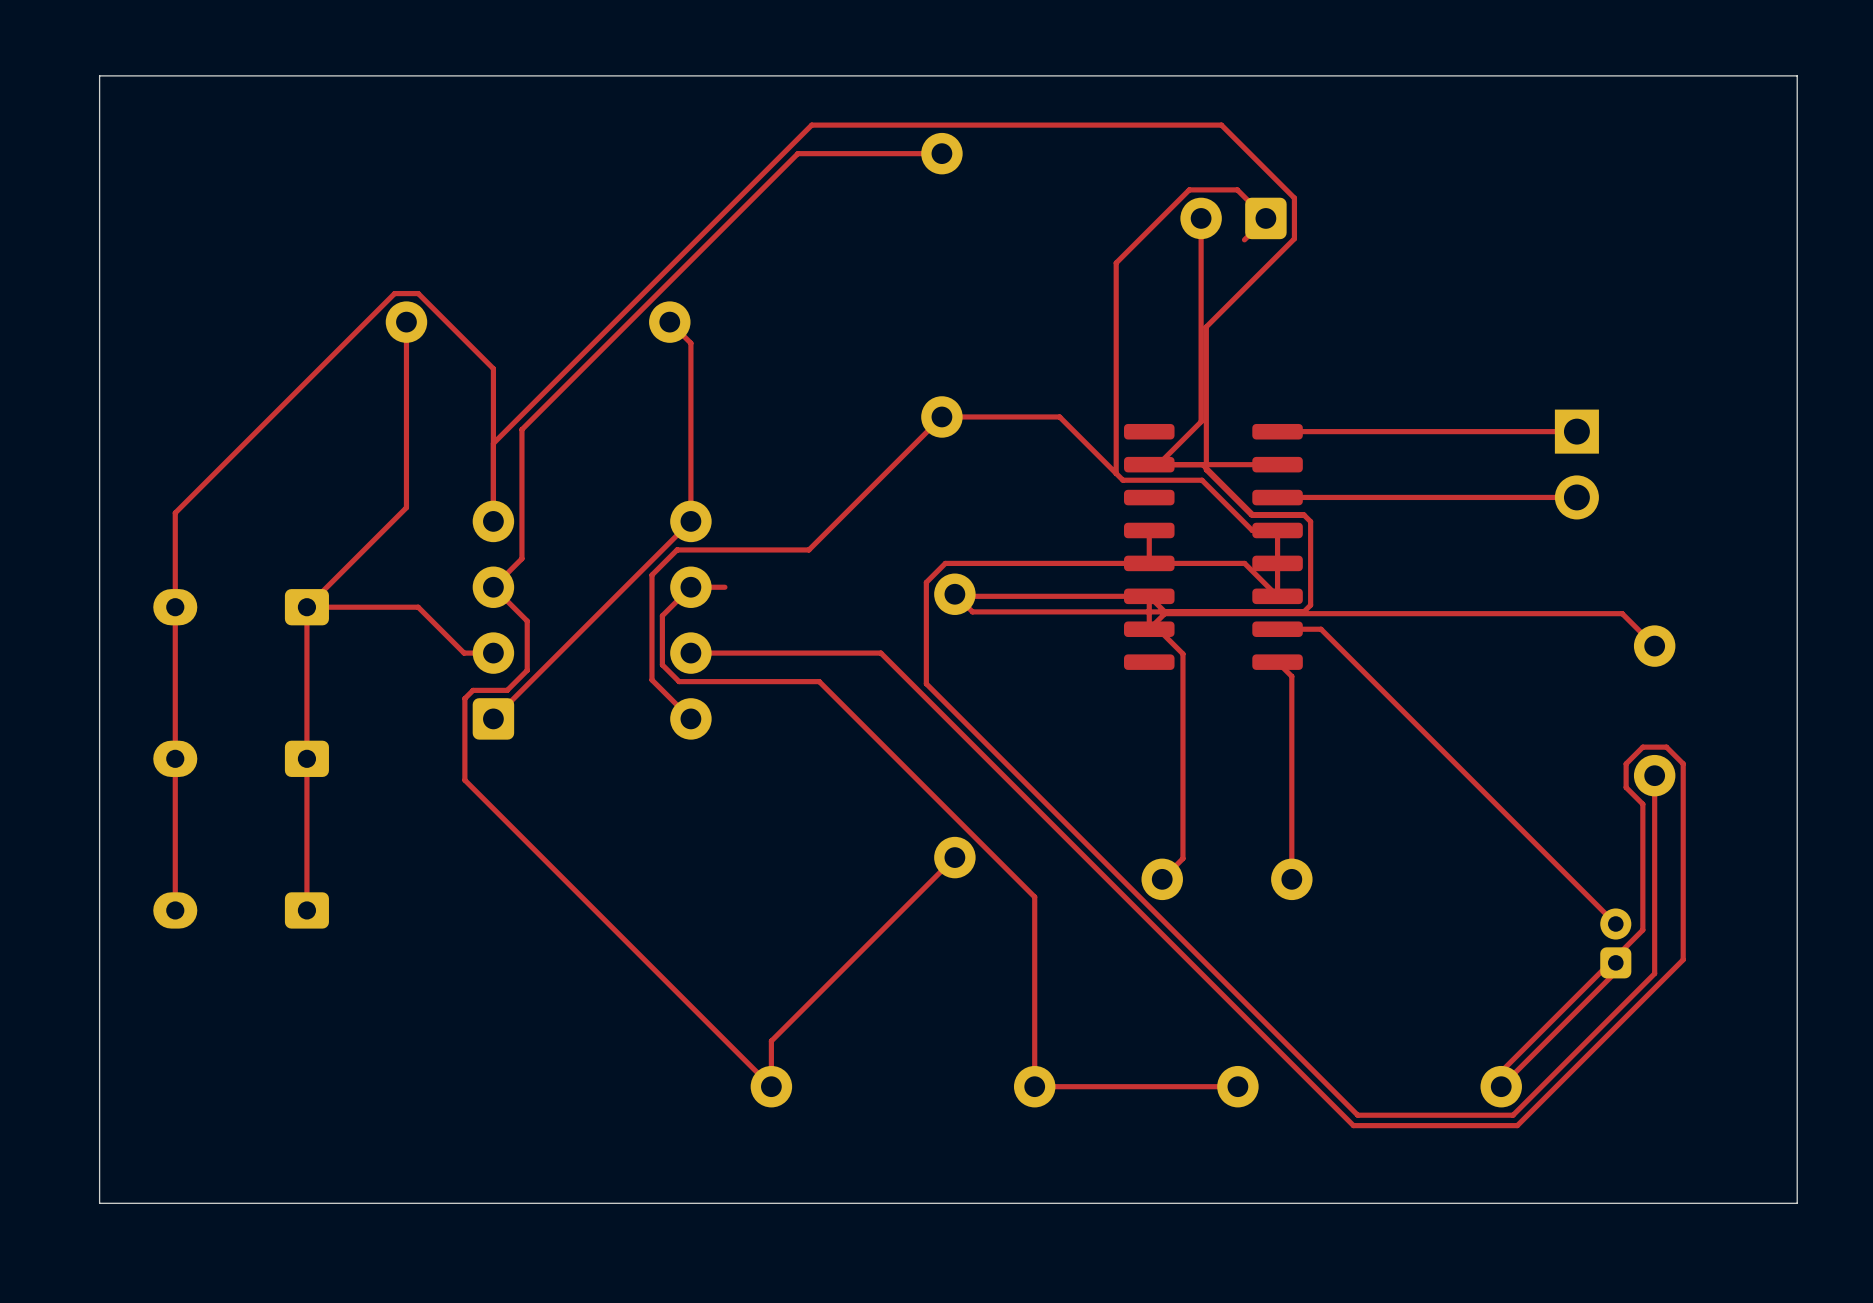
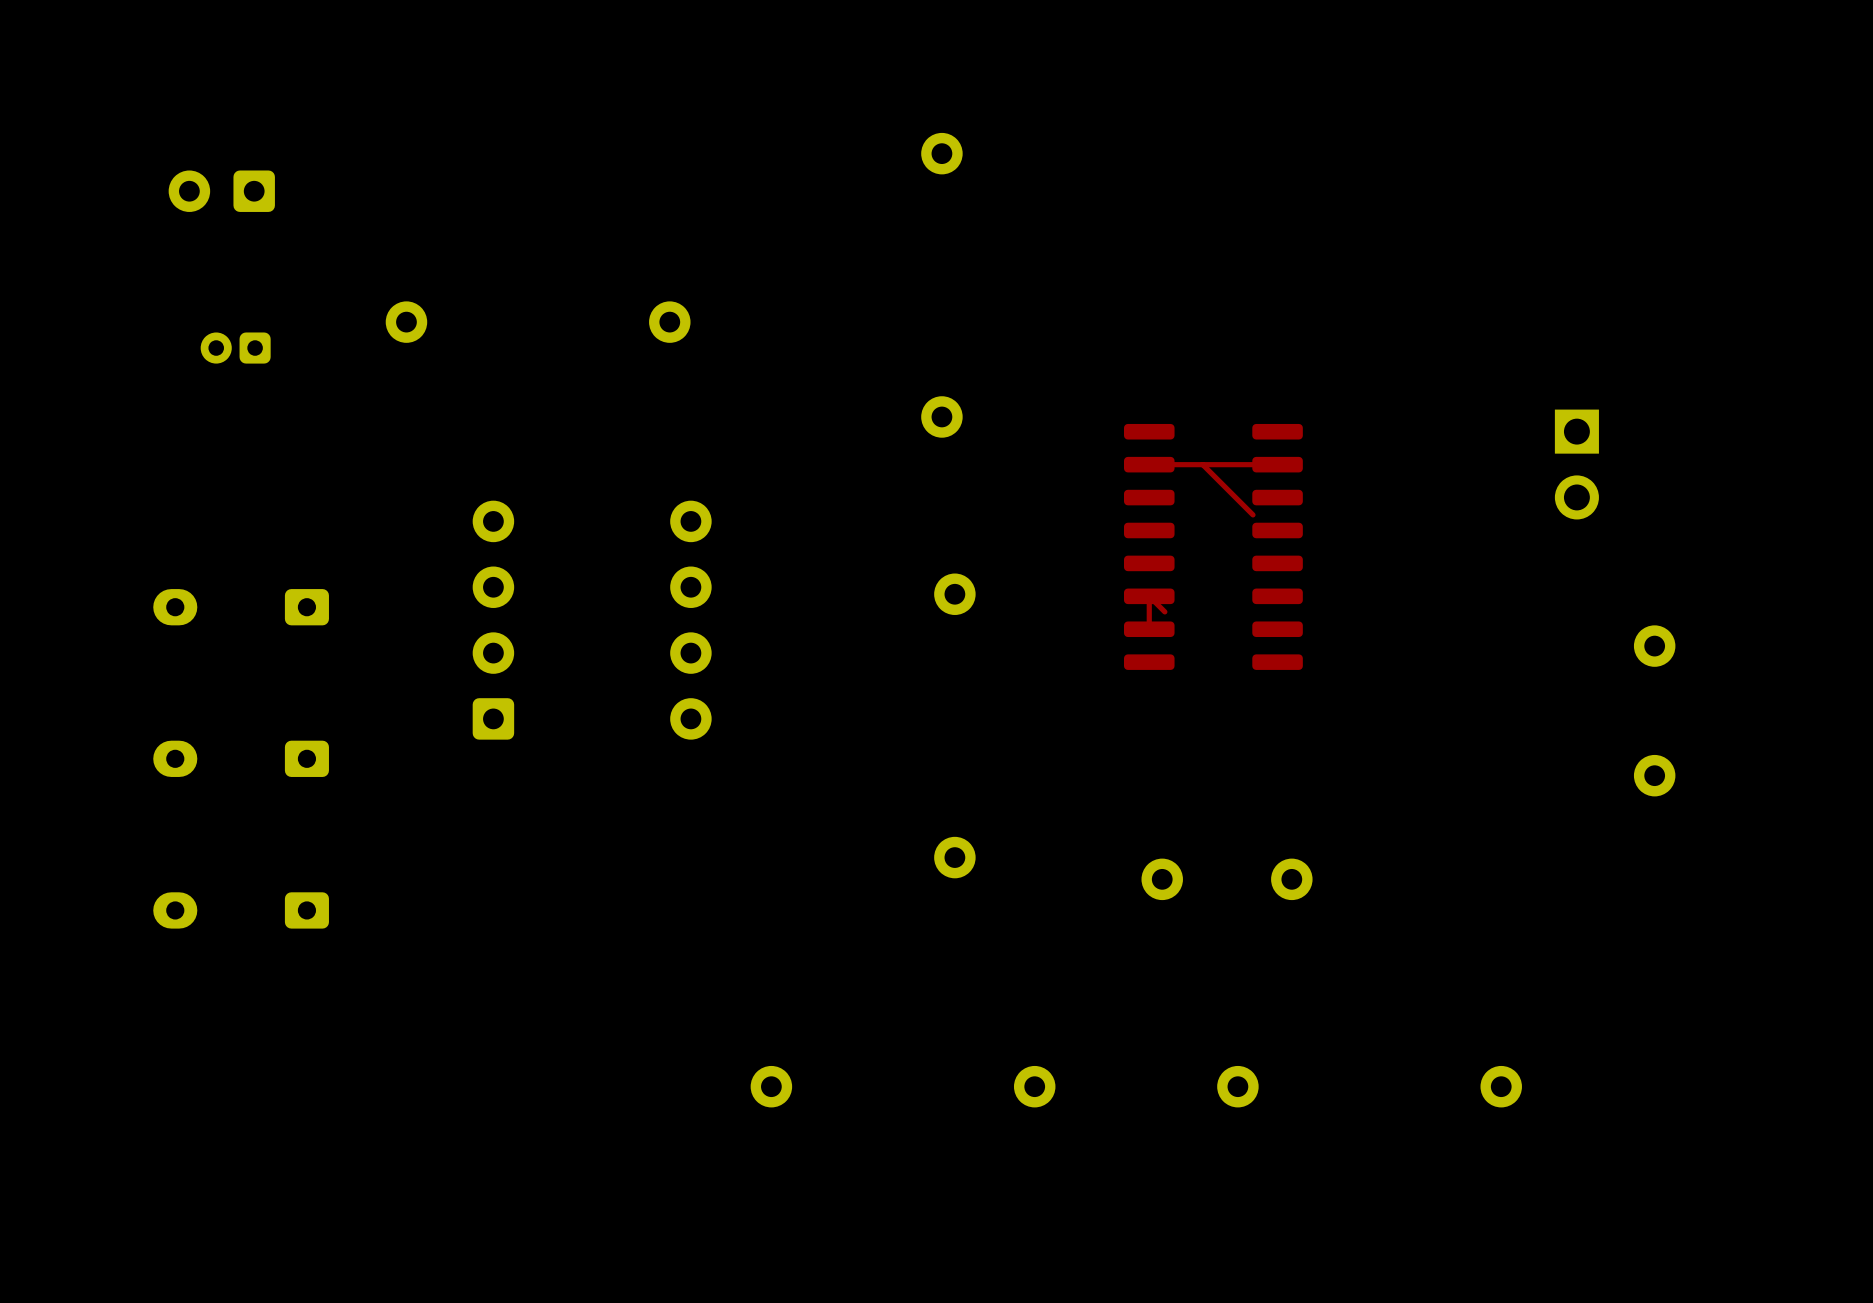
board edge: (1797, 75) (99, 75) (99, 1203) (1797, 1203) (1797, 75) -> none
top track: (941, 153) (797, 153) (521, 429) (521, 558) (493, 587) (527, 621) (527, 670) (507, 690) (473, 690) (464, 698) (464, 780) (771, 1086) (771, 1041) (954, 857) -> none
part: none -> (221, 191)
top track: (1201, 218) (1201, 421) (1158, 464) -> none
part: (1233, 218) -> none
top track: (1244, 239) (1265, 218) (1237, 189) (1189, 189) (1116, 262) (1116, 473) -> none
top track: (406, 322) (406, 507) (306, 607) -> none
top track: (669, 322) (690, 343) (690, 521) (493, 718) -> none
part: none -> (235, 348)
top track: (1576, 431) (1277, 431) -> none
top track: (493, 443) (811, 125) (1221, 125) (1294, 198) (1294, 238) (1206, 326) (1206, 469) (1251, 514) (1303, 514) (1310, 521) (1310, 605) (1303, 611) (972, 611) (954, 594) -> none
top track: (1576, 497) (1277, 497) -> none
top track: (493, 521) (493, 368) (418, 293) (394, 293) (175, 512) (175, 910) -> none
top track: (1149, 530) (1149, 563) -> none
top track: (724, 587) (690, 587) (662, 615) (662, 664) (679, 681) (819, 681) (1034, 897) (1034, 1086) (1237, 1086) -> none
top track: (1149, 596) (956, 596) -> none
top track: (306, 607) (306, 910) -> none
top track: (306, 607) (418, 607) (464, 653) (493, 653) -> none
top track: (1277, 629) (1321, 629) (1615, 923) -> none
top track: (1654, 646) (1622, 613) (1164, 613) (1149, 629) (1158, 629) (1182, 653) (1182, 858) (1162, 879) -> none
top track: (690, 653) (880, 653) (1353, 1125) (1517, 1125) (1683, 959) (1683, 763) (1666, 747) (1642, 747) (1626, 763) (1626, 787) (1642, 804) (1642, 930) (1499, 1073) (1501, 1075) (1501, 1086) (1615, 972) (1615, 962) -> none
top track: (1277, 662) (1291, 676) (1291, 879) -> none
top track: (690, 718) (651, 679) (651, 575) (677, 549) (808, 549) (941, 416) (1059, 416) (1122, 480) (1202, 480) (1252, 530) (1277, 530) (1277, 596) (1244, 563) (945, 563) (926, 582) (926, 683) (1357, 1115) (1513, 1115) (1654, 973) (1654, 775) -> none
part: (1615, 943) -> none

